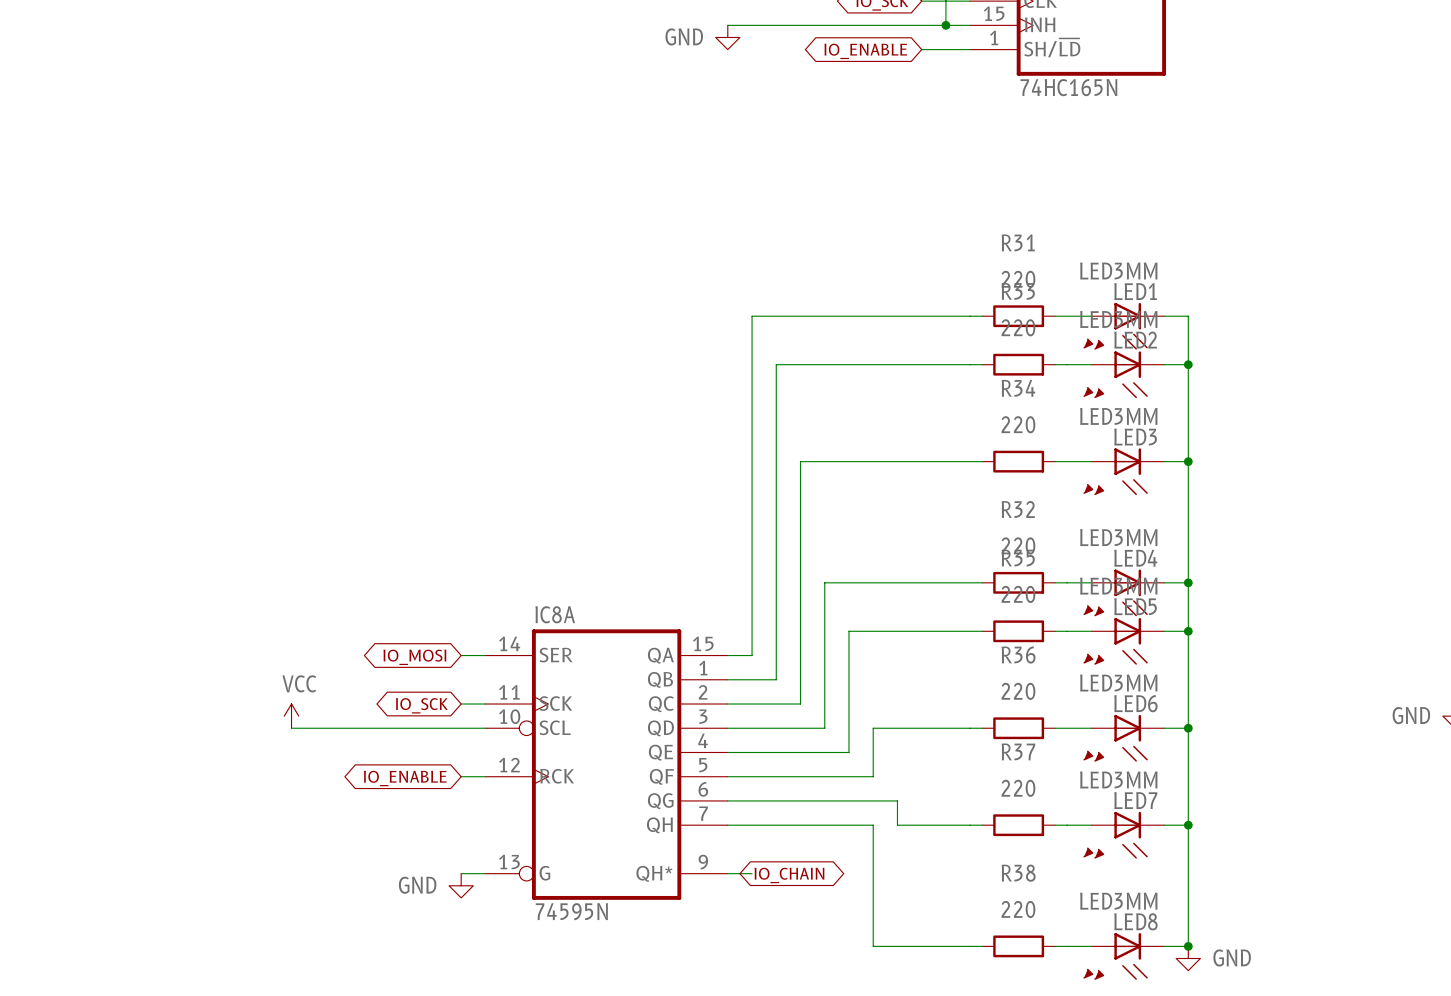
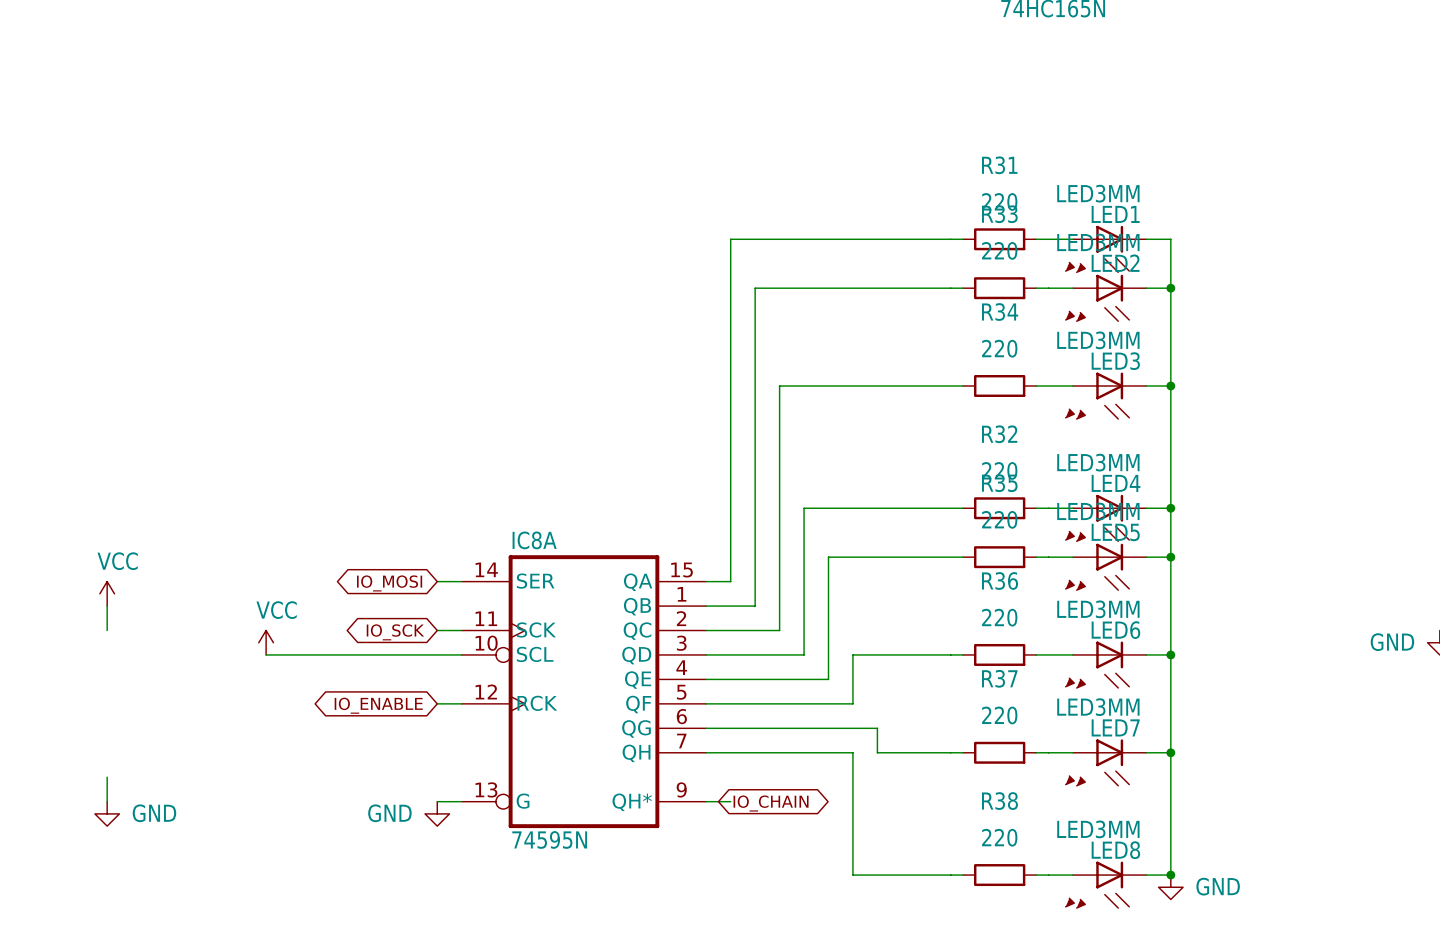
power symbol: none -> VCC (107, 593)
wire: none -> (107, 606) (107, 630)
wire: none -> (107, 777) (107, 801)
power symbol: none -> GND (107, 813)

